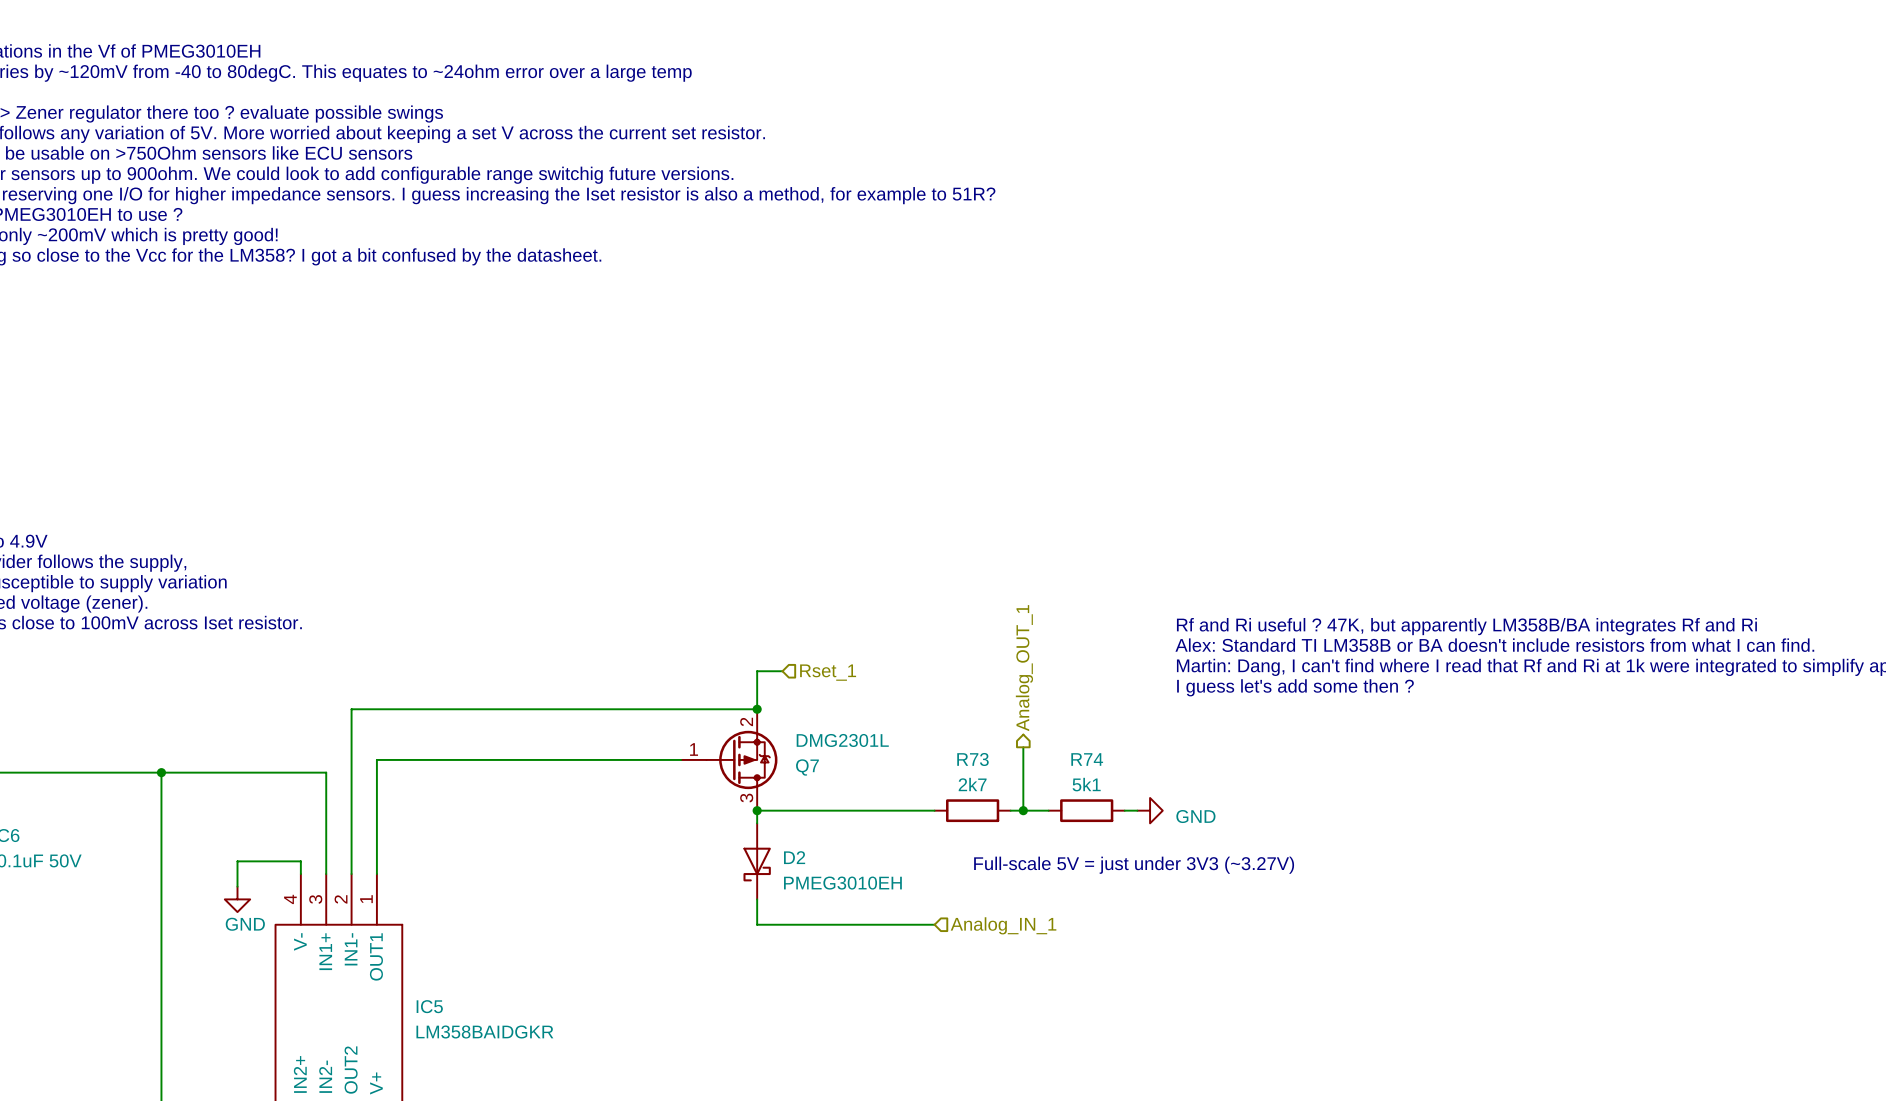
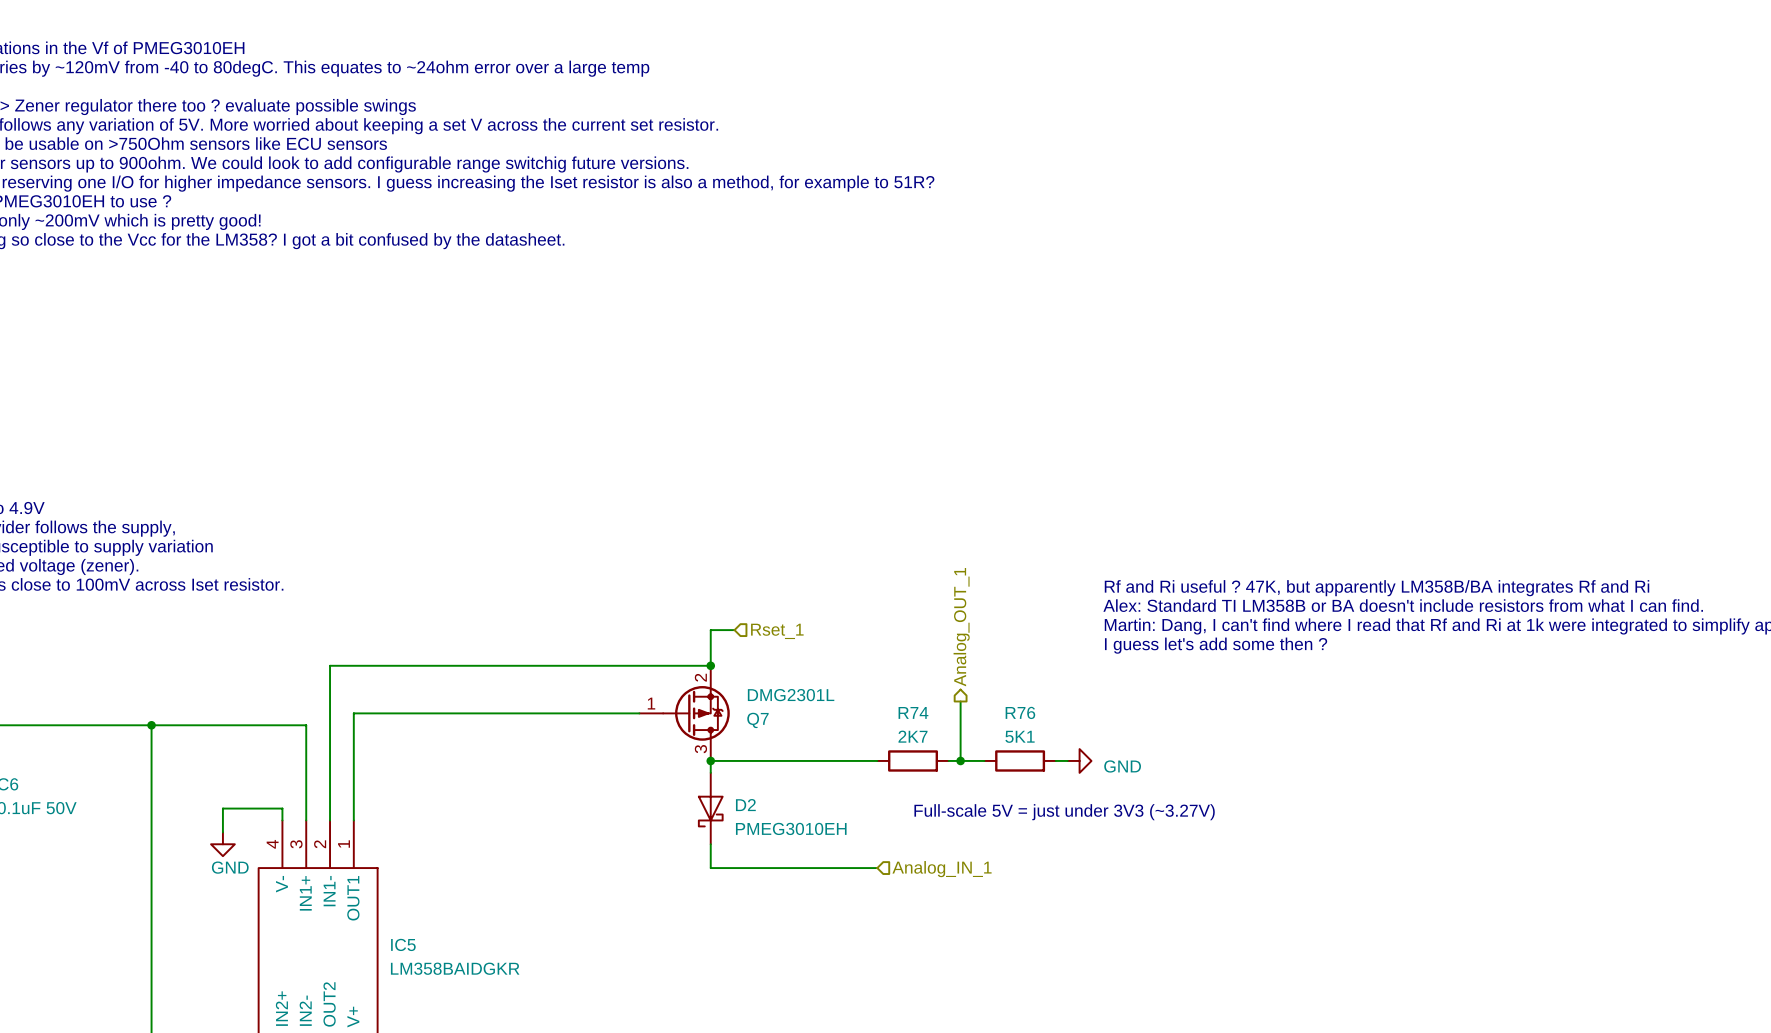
R73 name: R73 (972, 759) -> R74 (913, 712)
R74 name: R74 (1087, 759) -> R76 (1020, 712)
R73 value: 2k7 (972, 784) -> 2K7 (913, 736)
R74 value: 5k1 (1086, 784) -> 5K1 (1020, 736)

